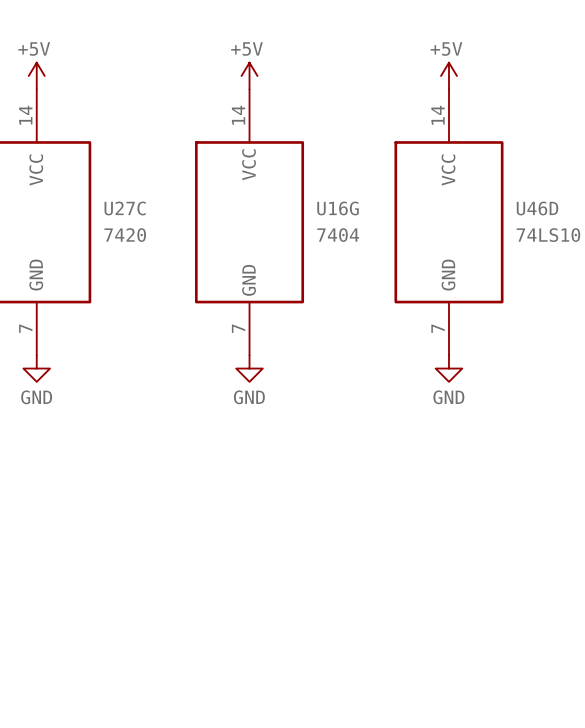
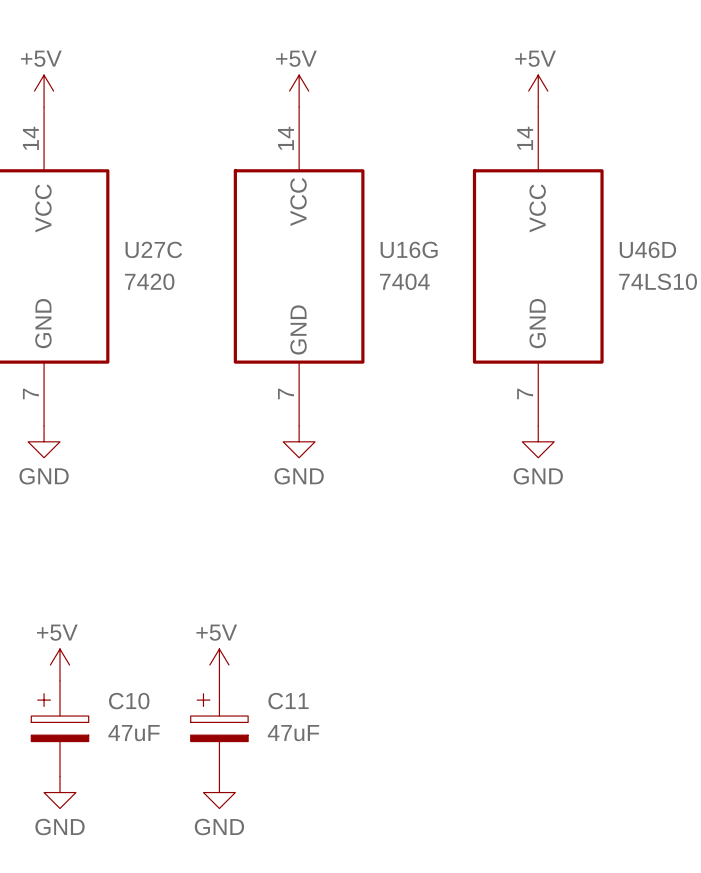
power symbol: none -> +5V (59, 665)
power symbol: none -> +5V (219, 665)
C10: none -> 47uF (59, 728)
C11: none -> 47uF (219, 728)
power symbol: none -> GND (59, 792)
power symbol: none -> GND (219, 792)

